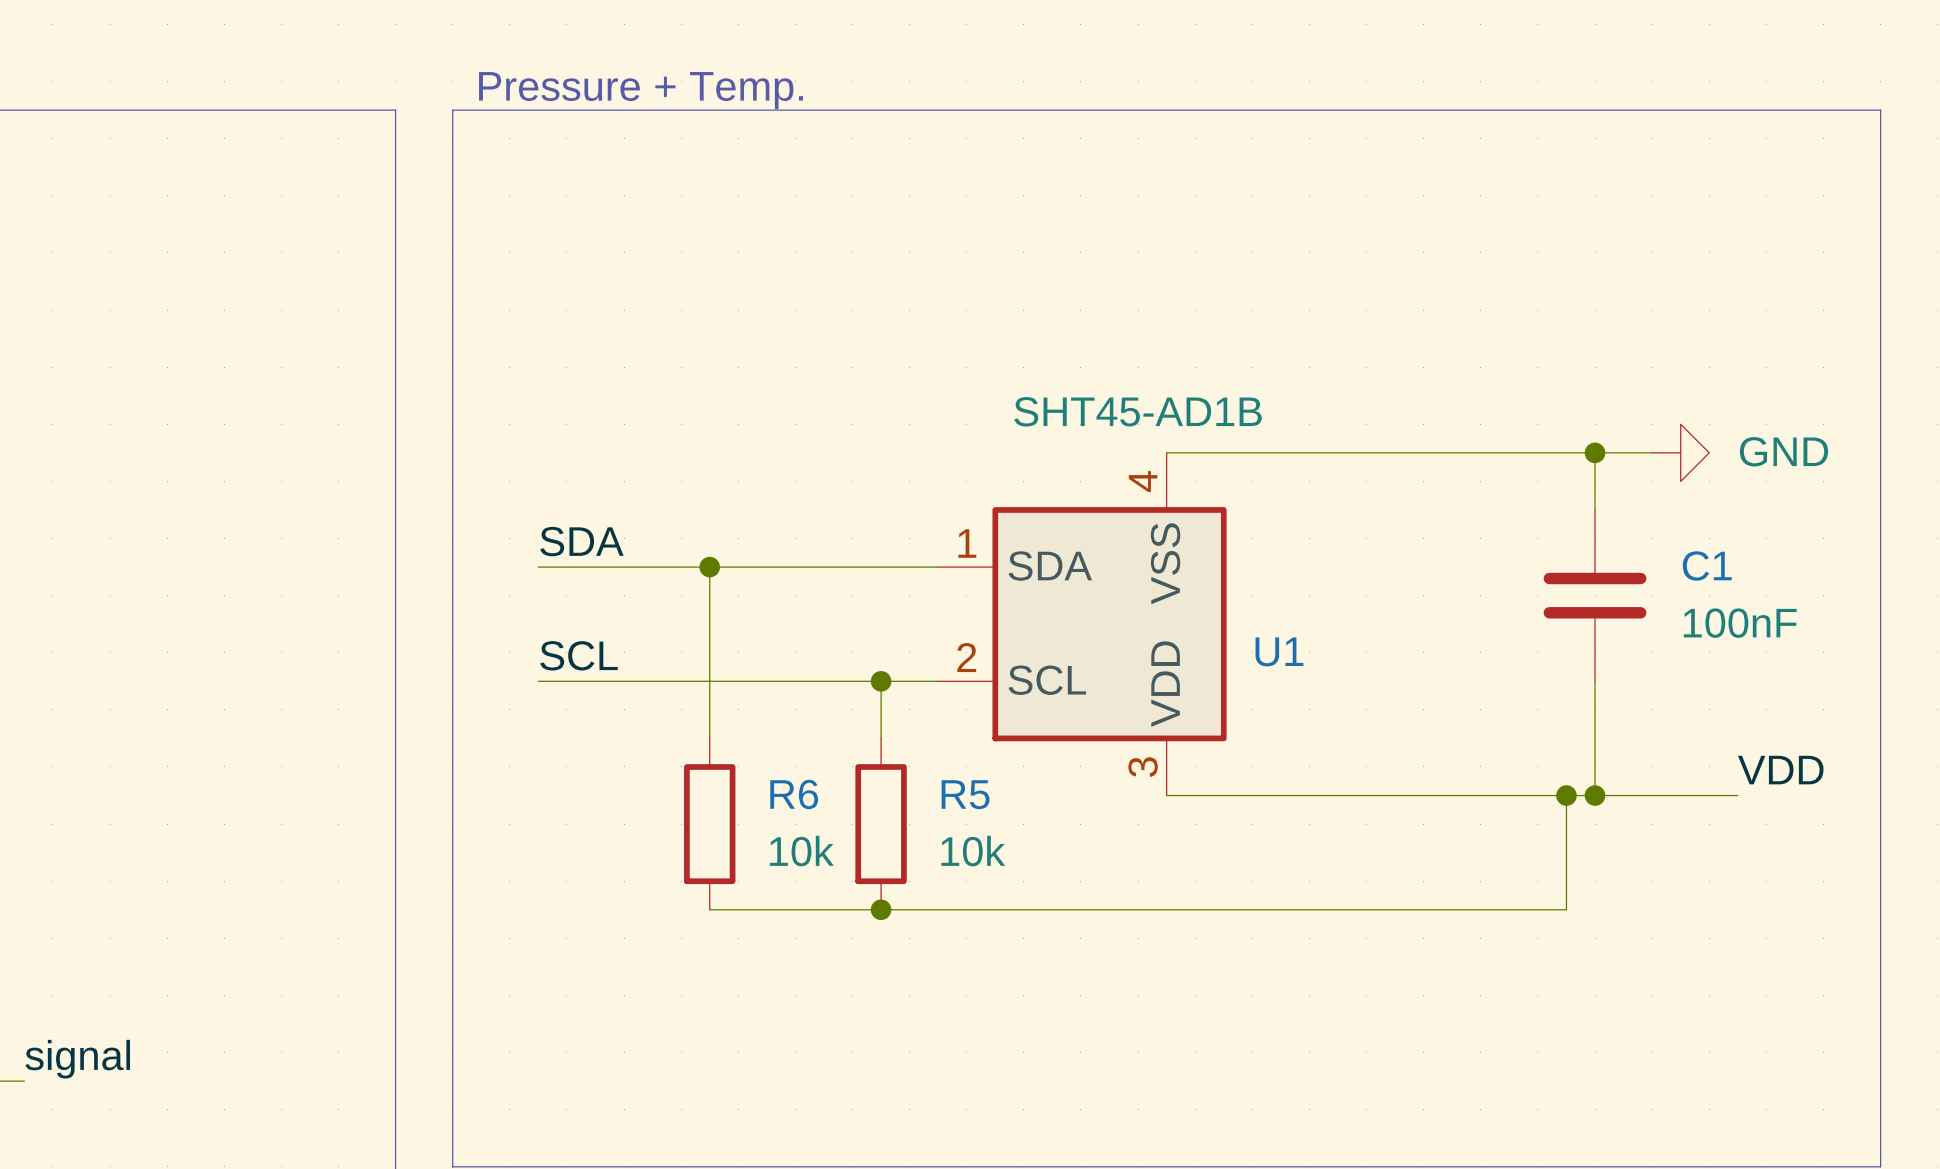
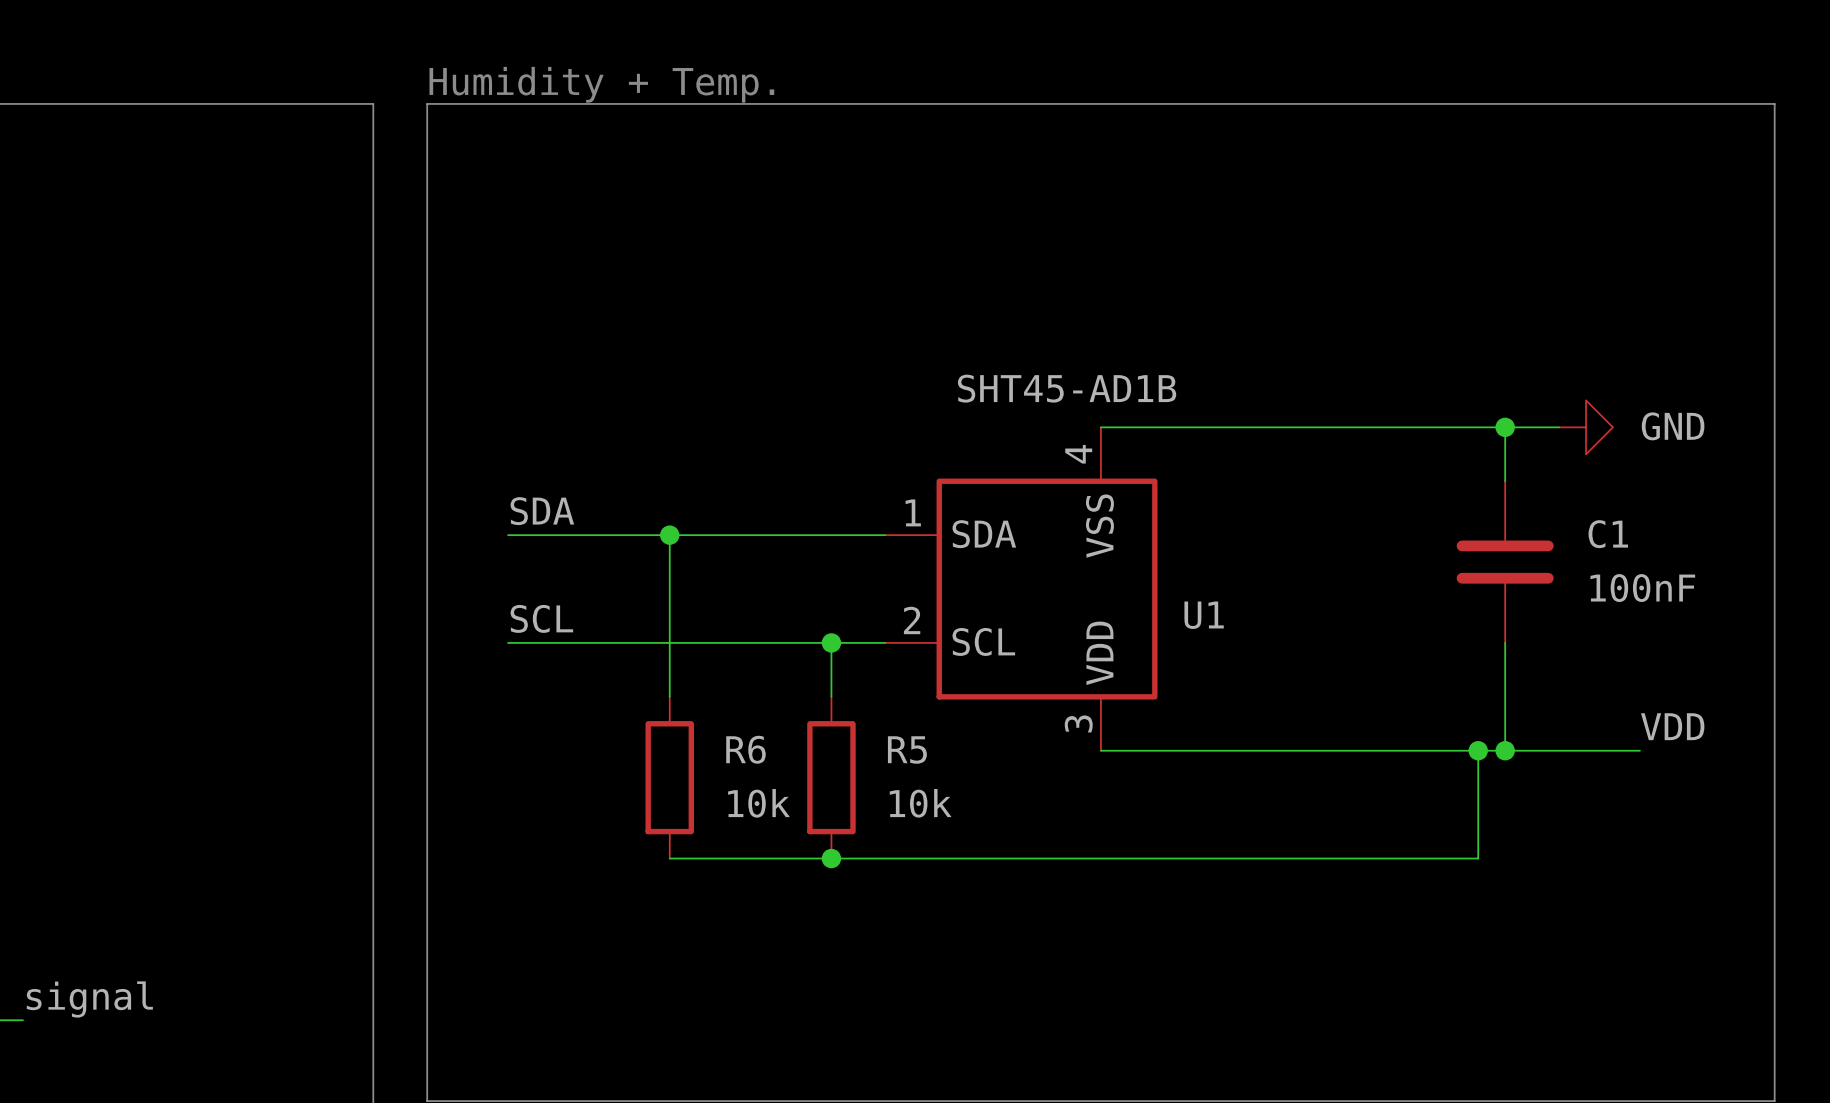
text: Pressure + Temp. (640, 90) -> Humidity + Temp. (601, 84)

